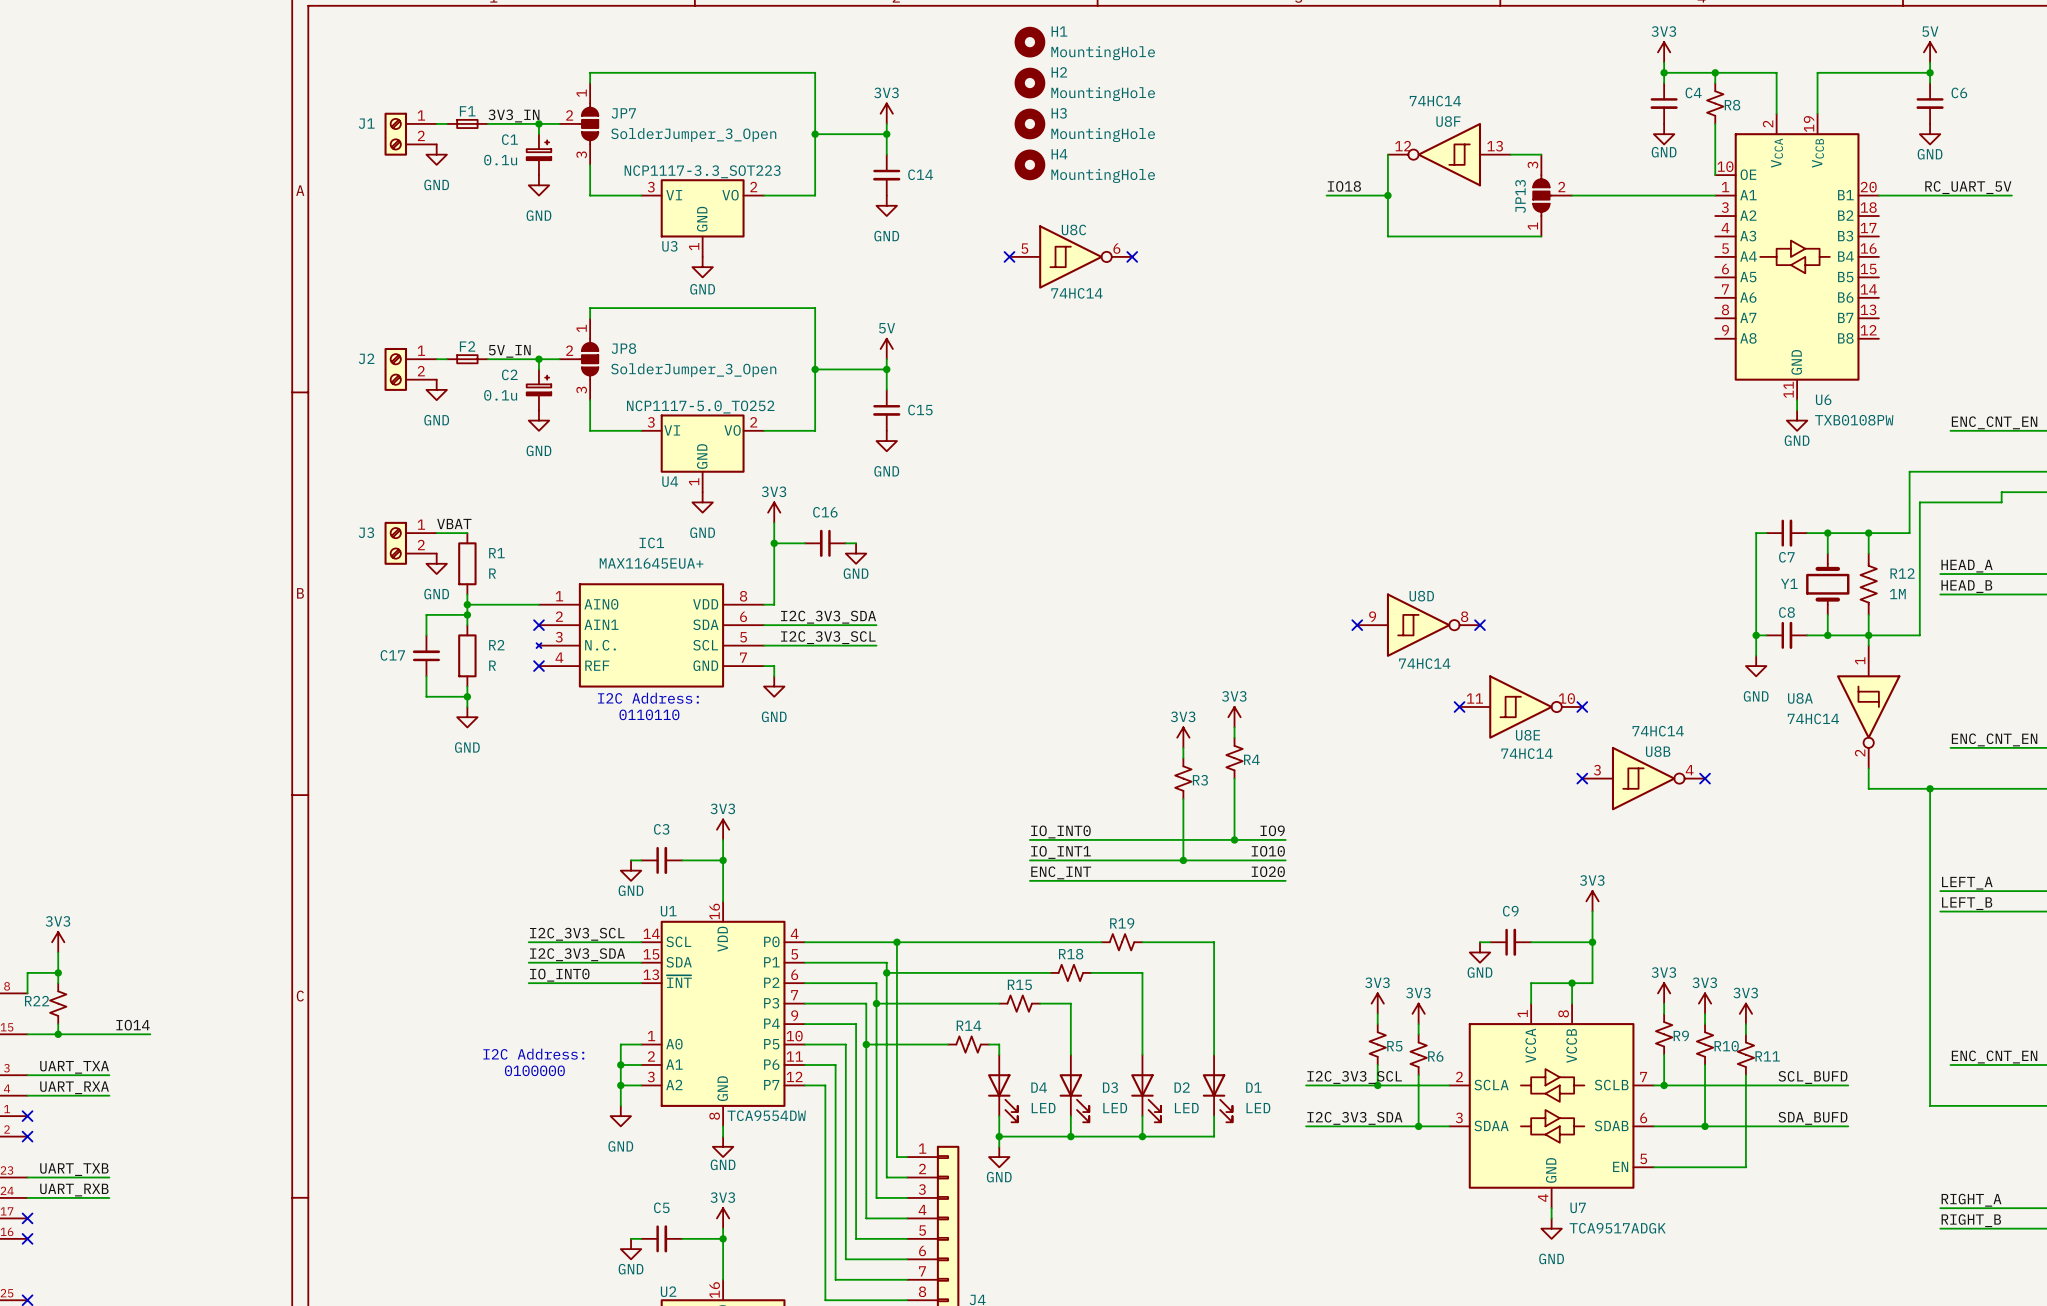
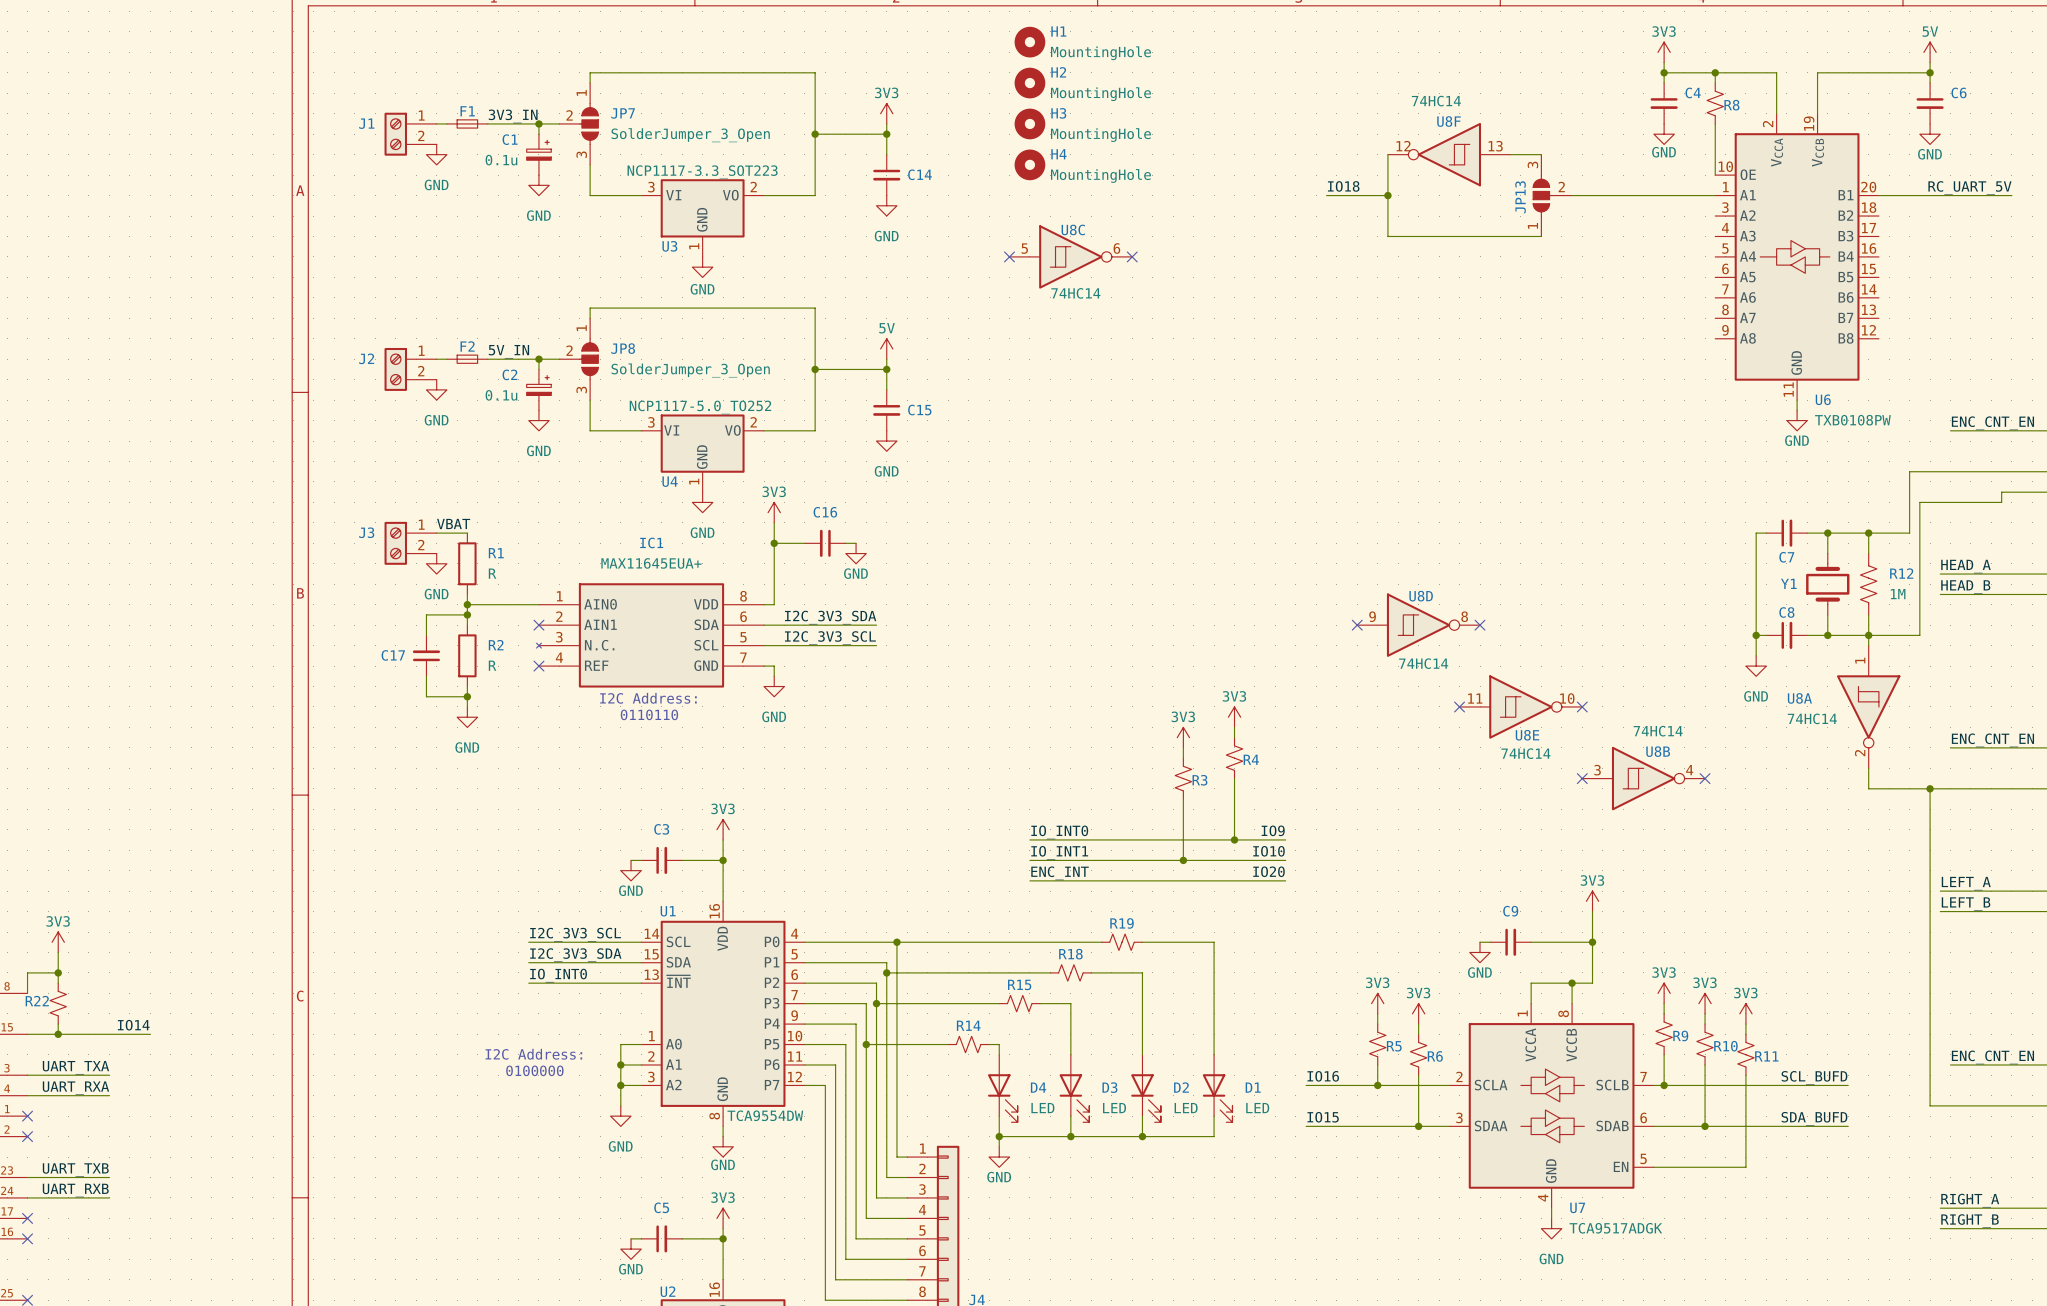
label: I2C_3V3_SCL (1354, 1077) -> IO16 (1323, 1076)
label: I2C_3V3_SDA (1354, 1118) -> IO15 (1323, 1117)

